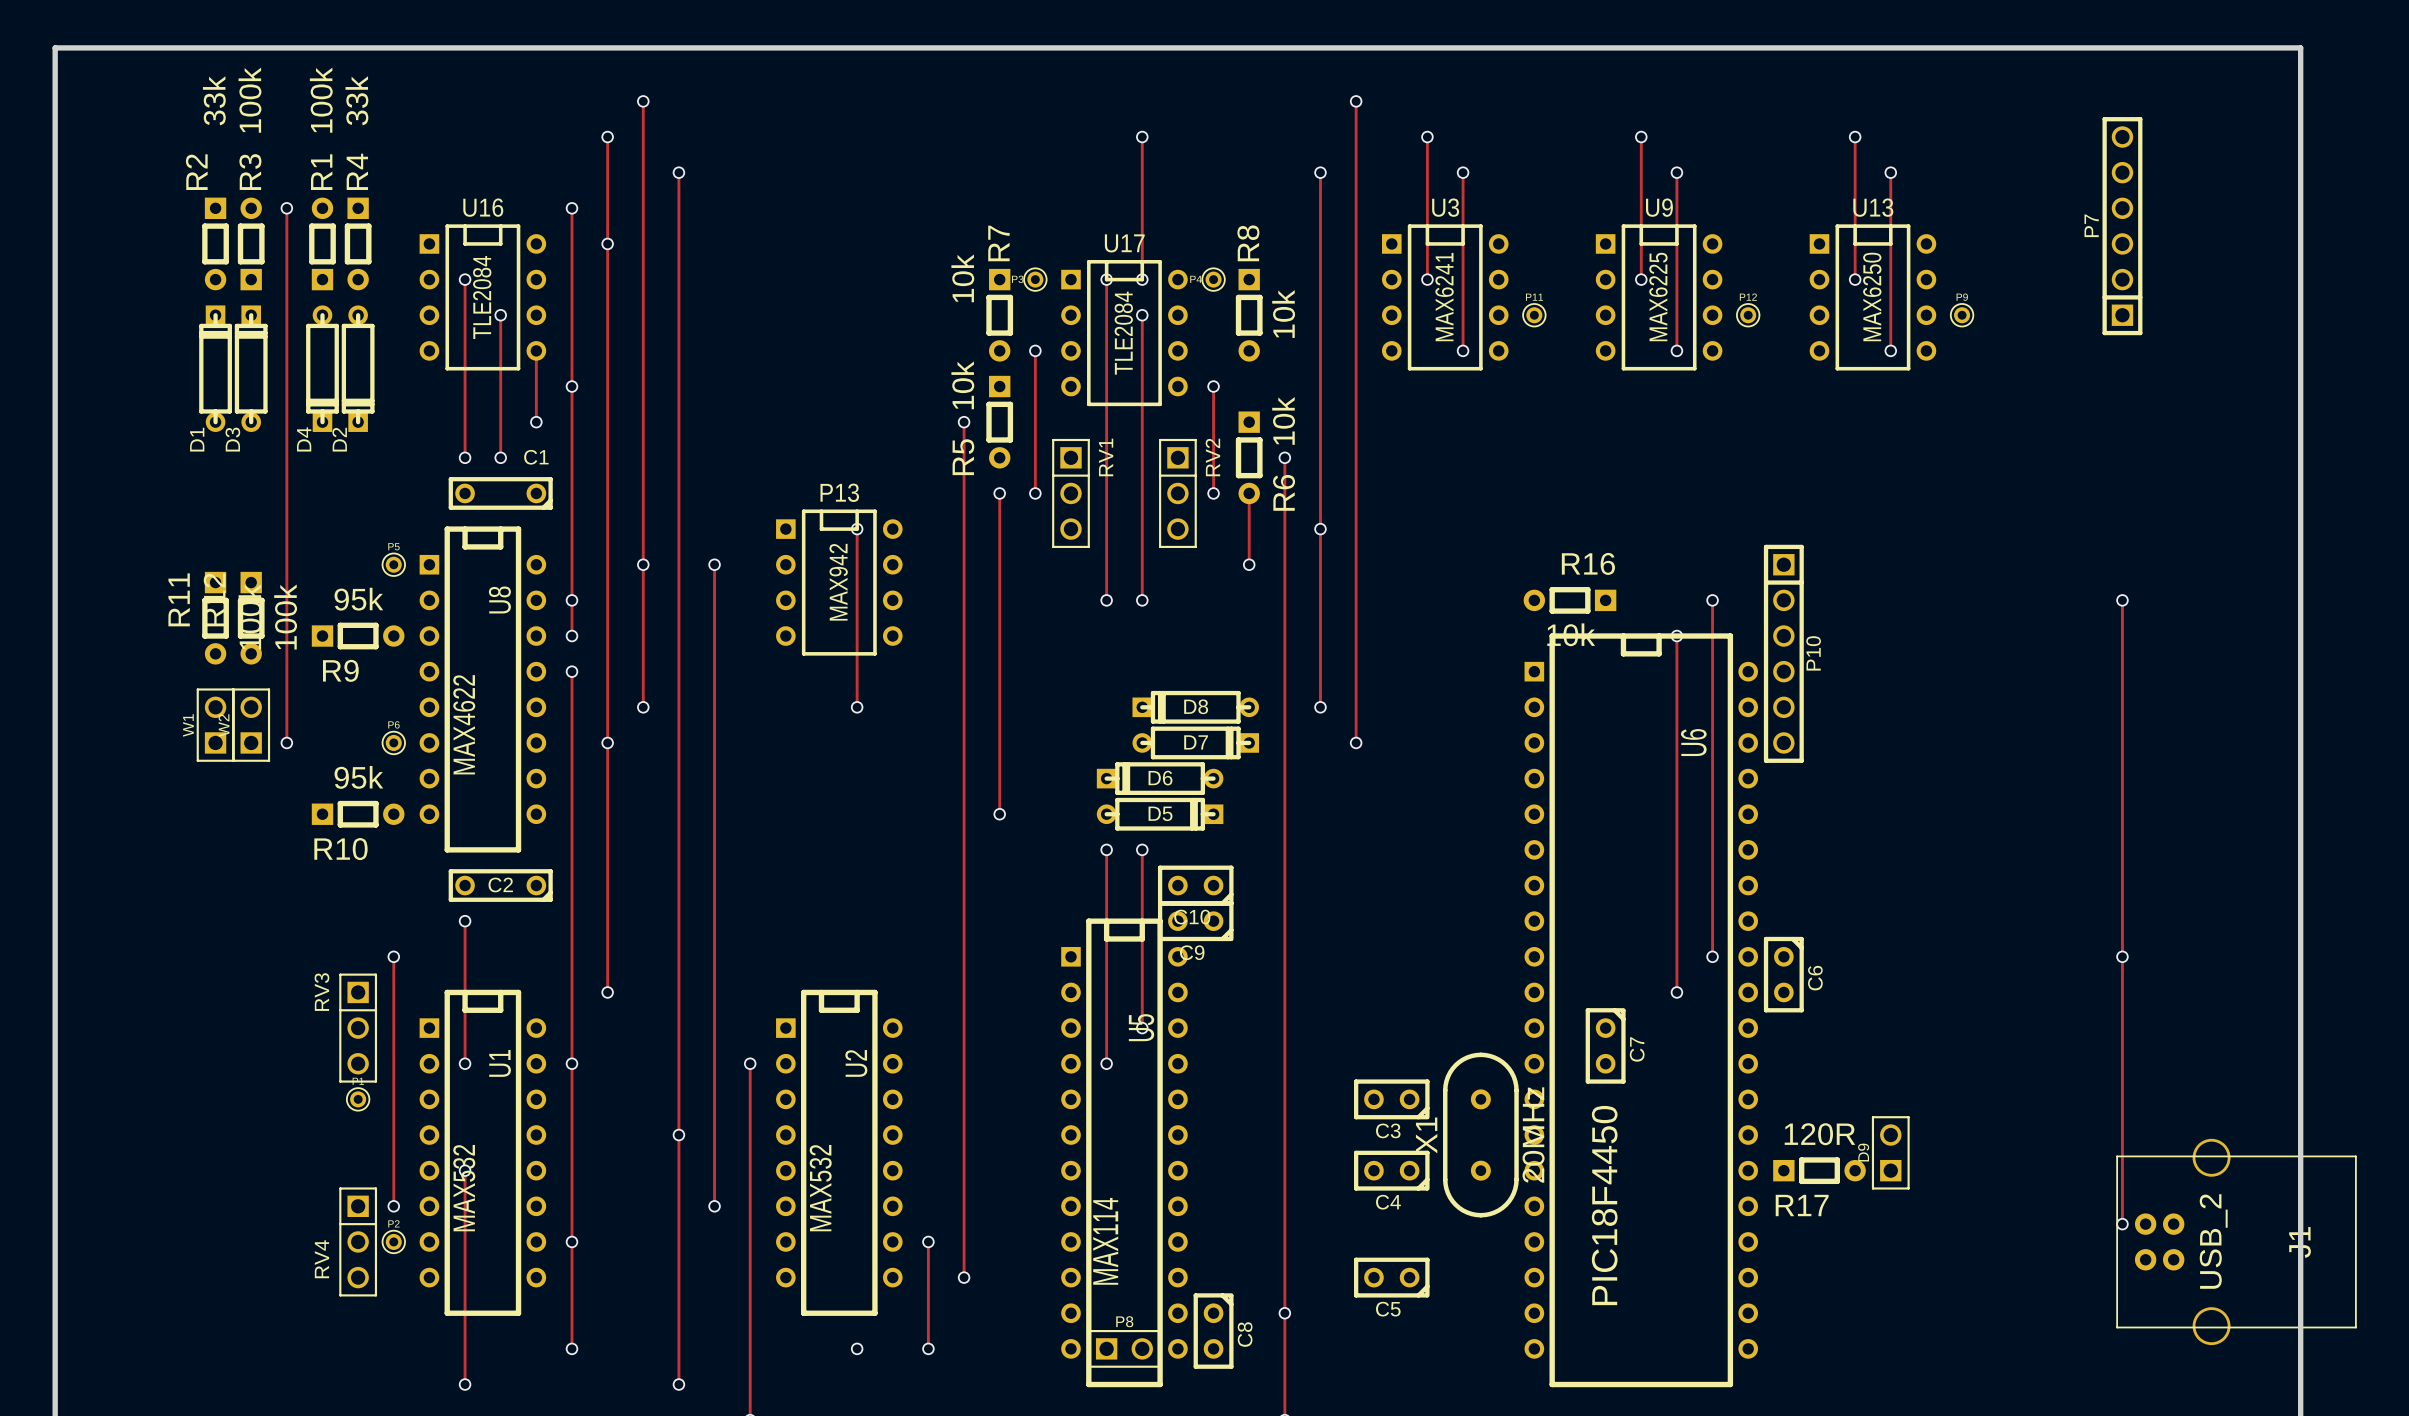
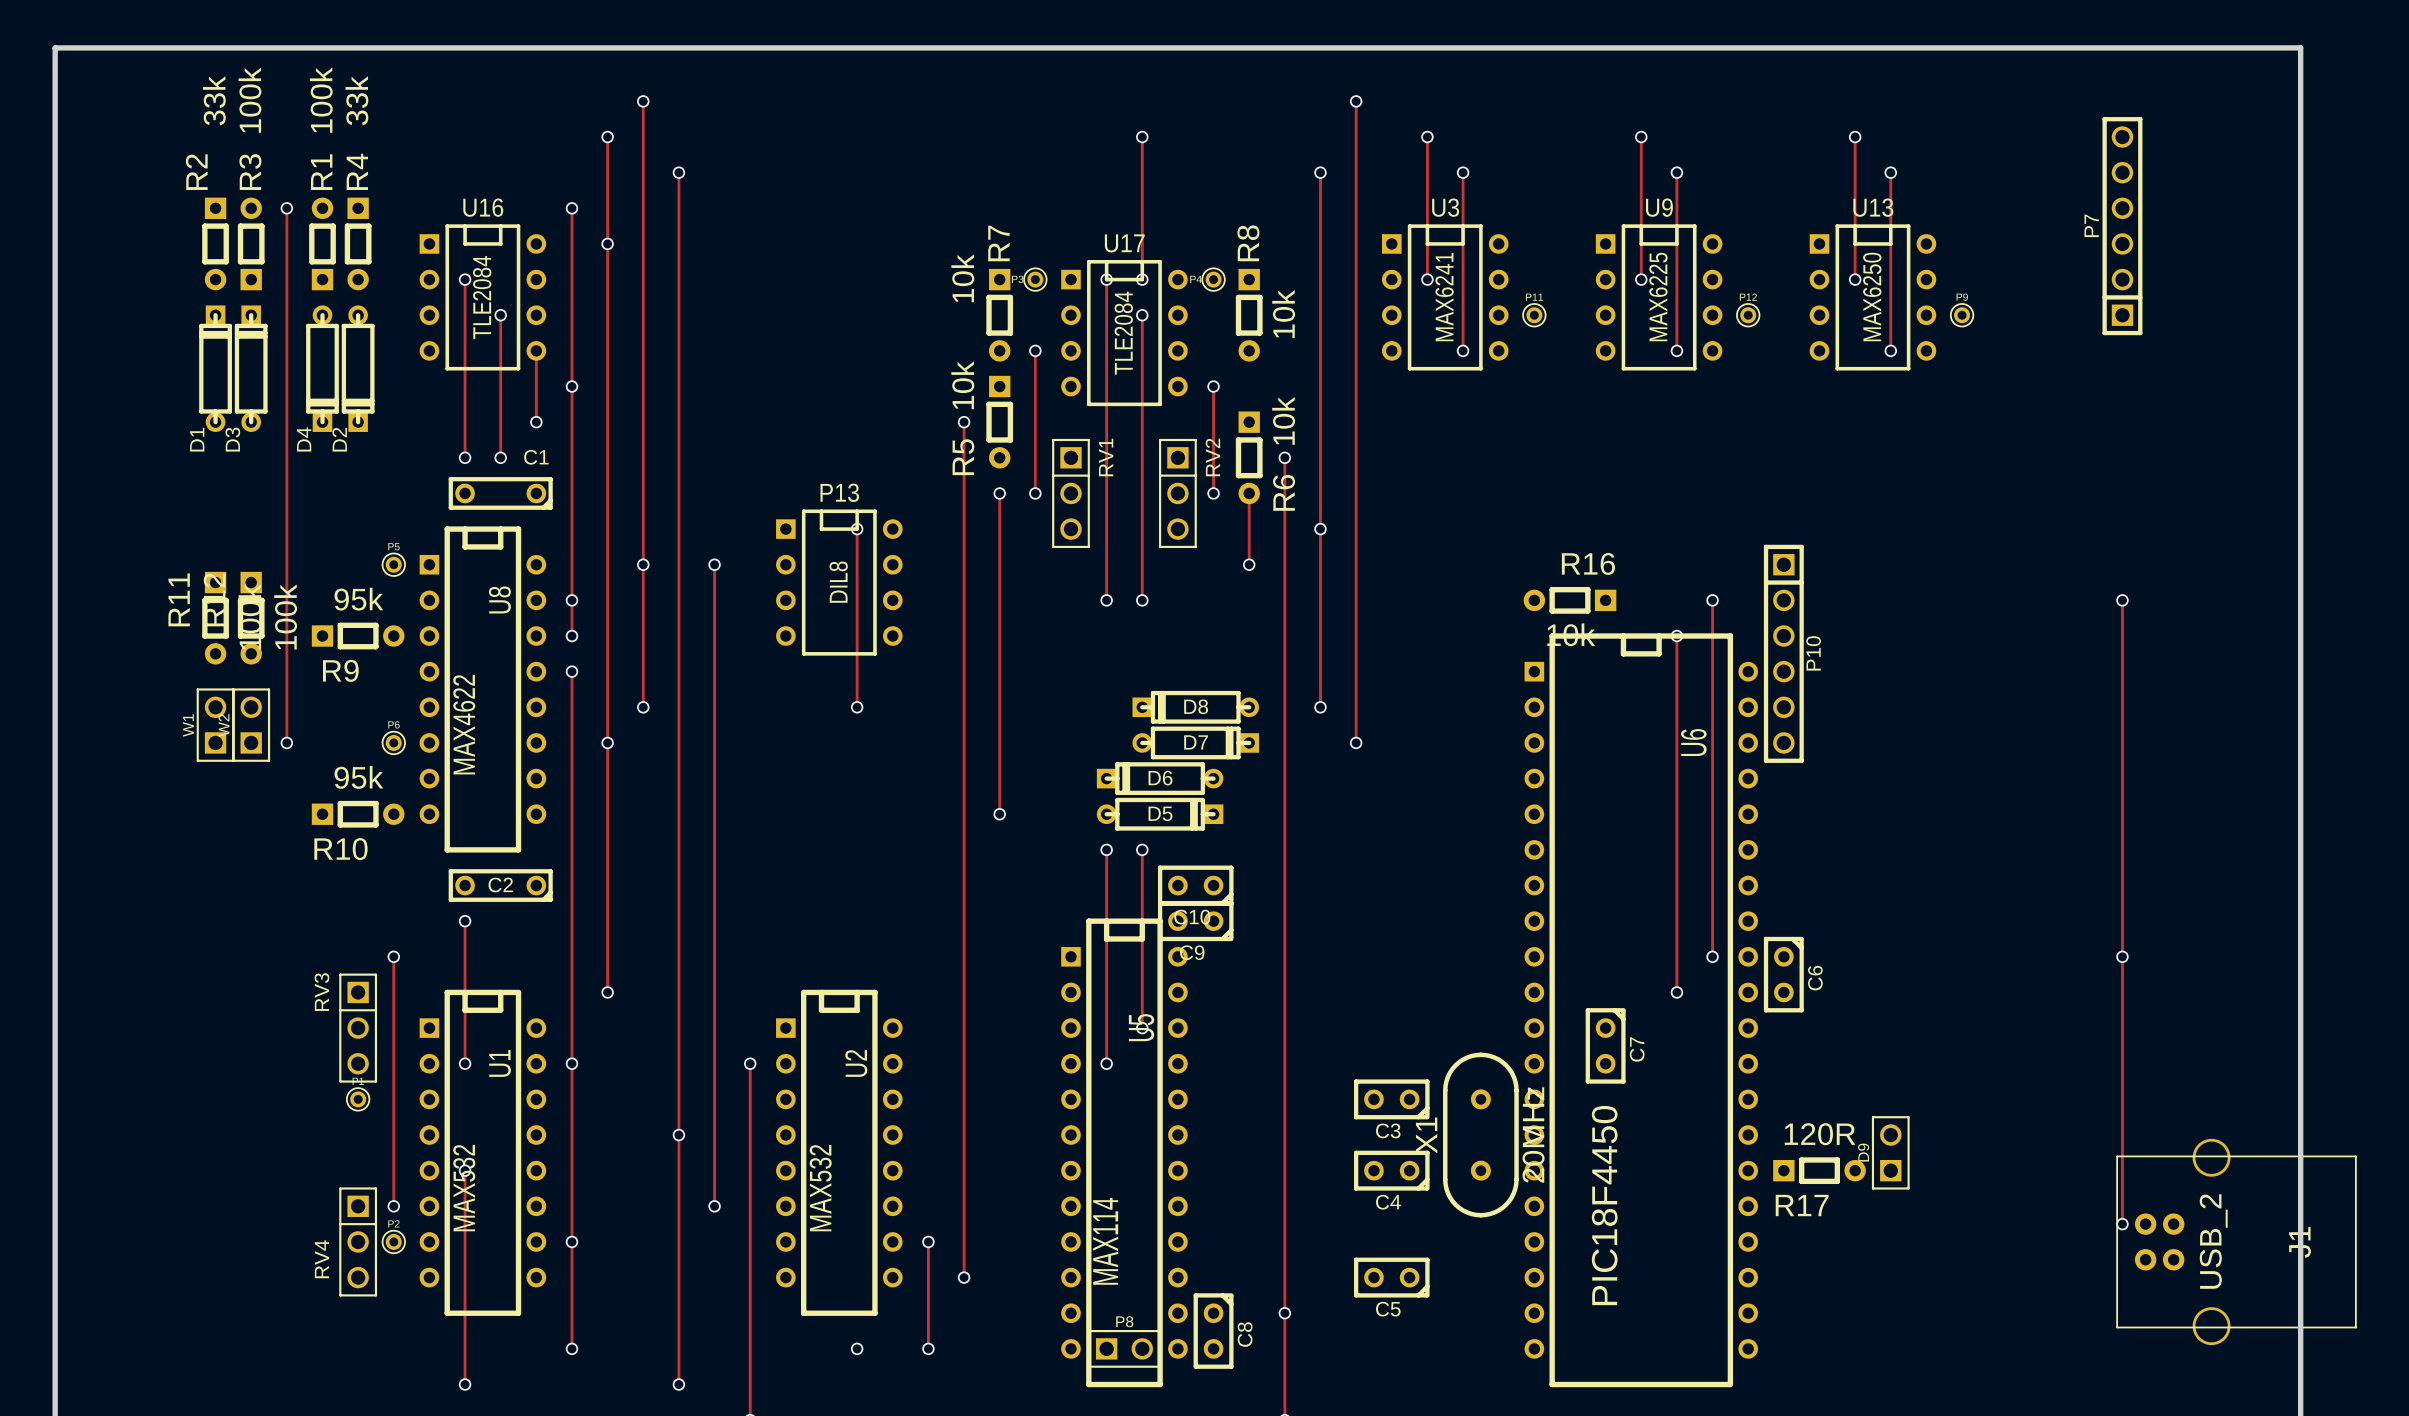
P13 value: MAX942 (838, 582) -> DIL8 (838, 582)

